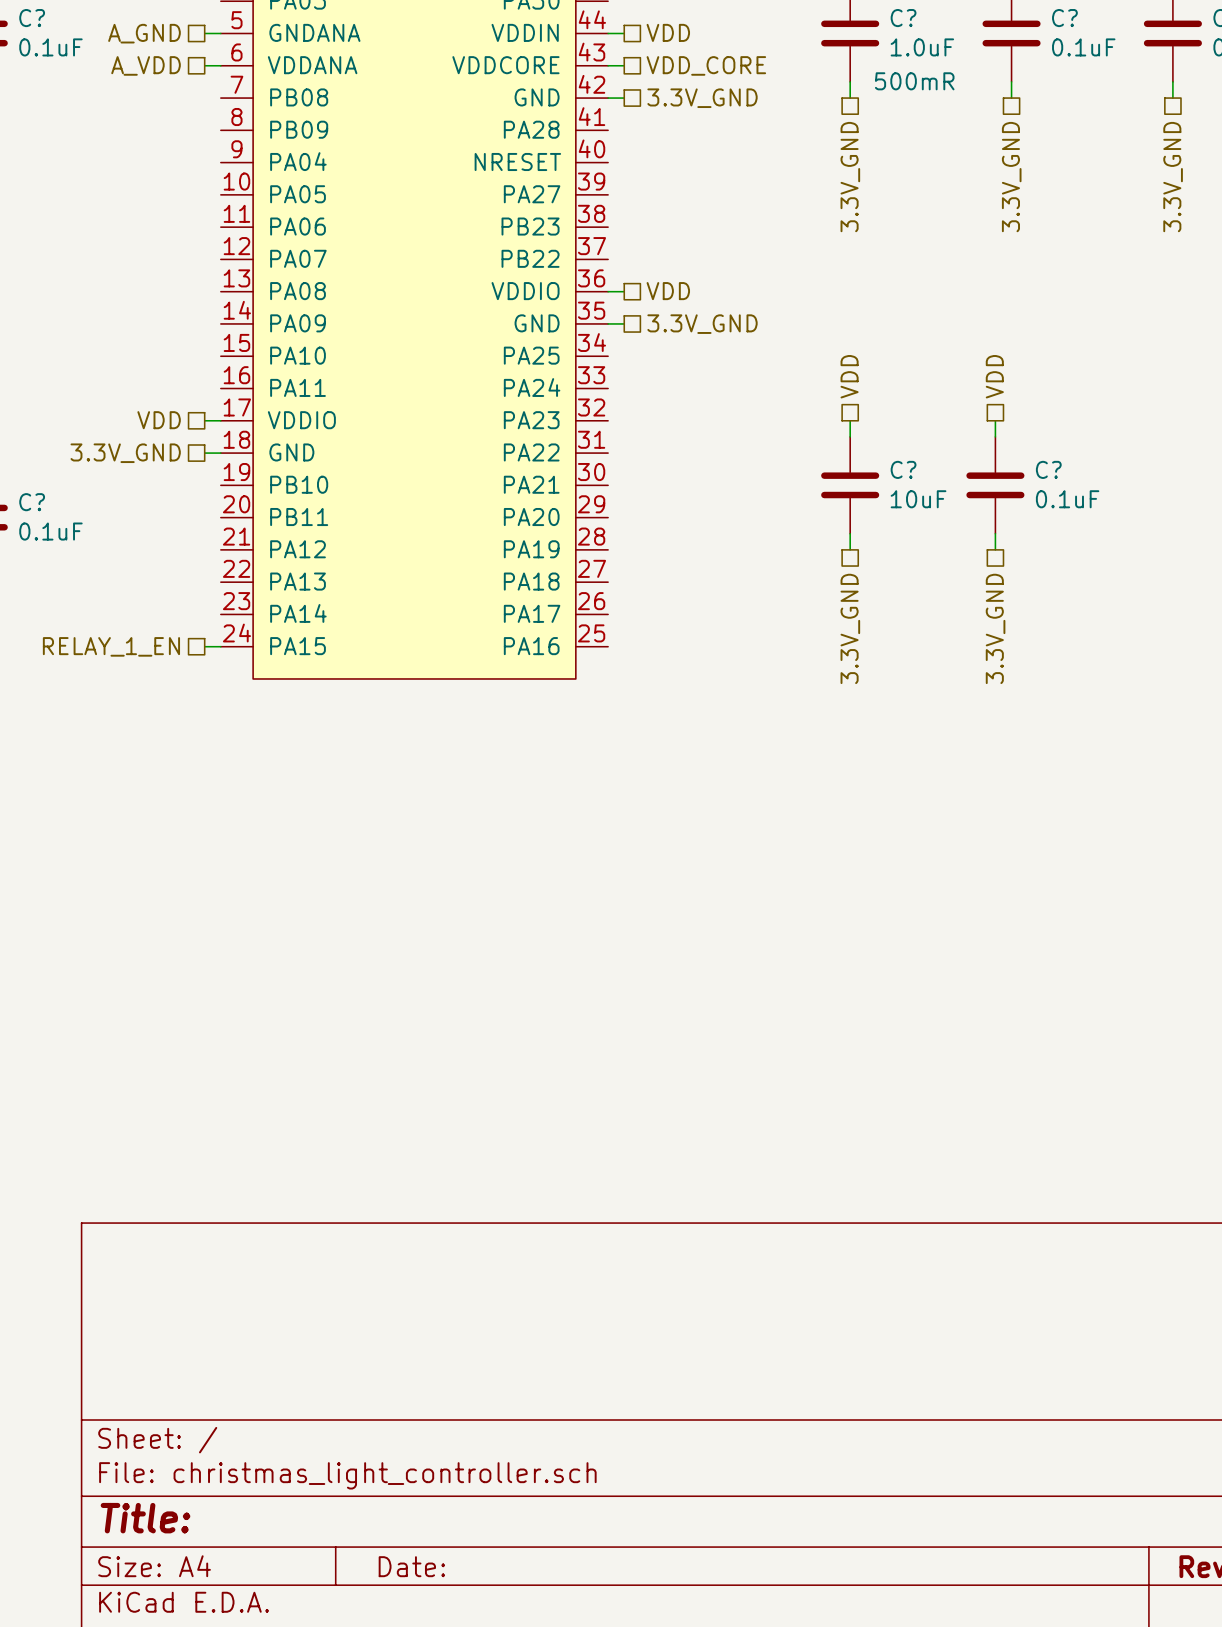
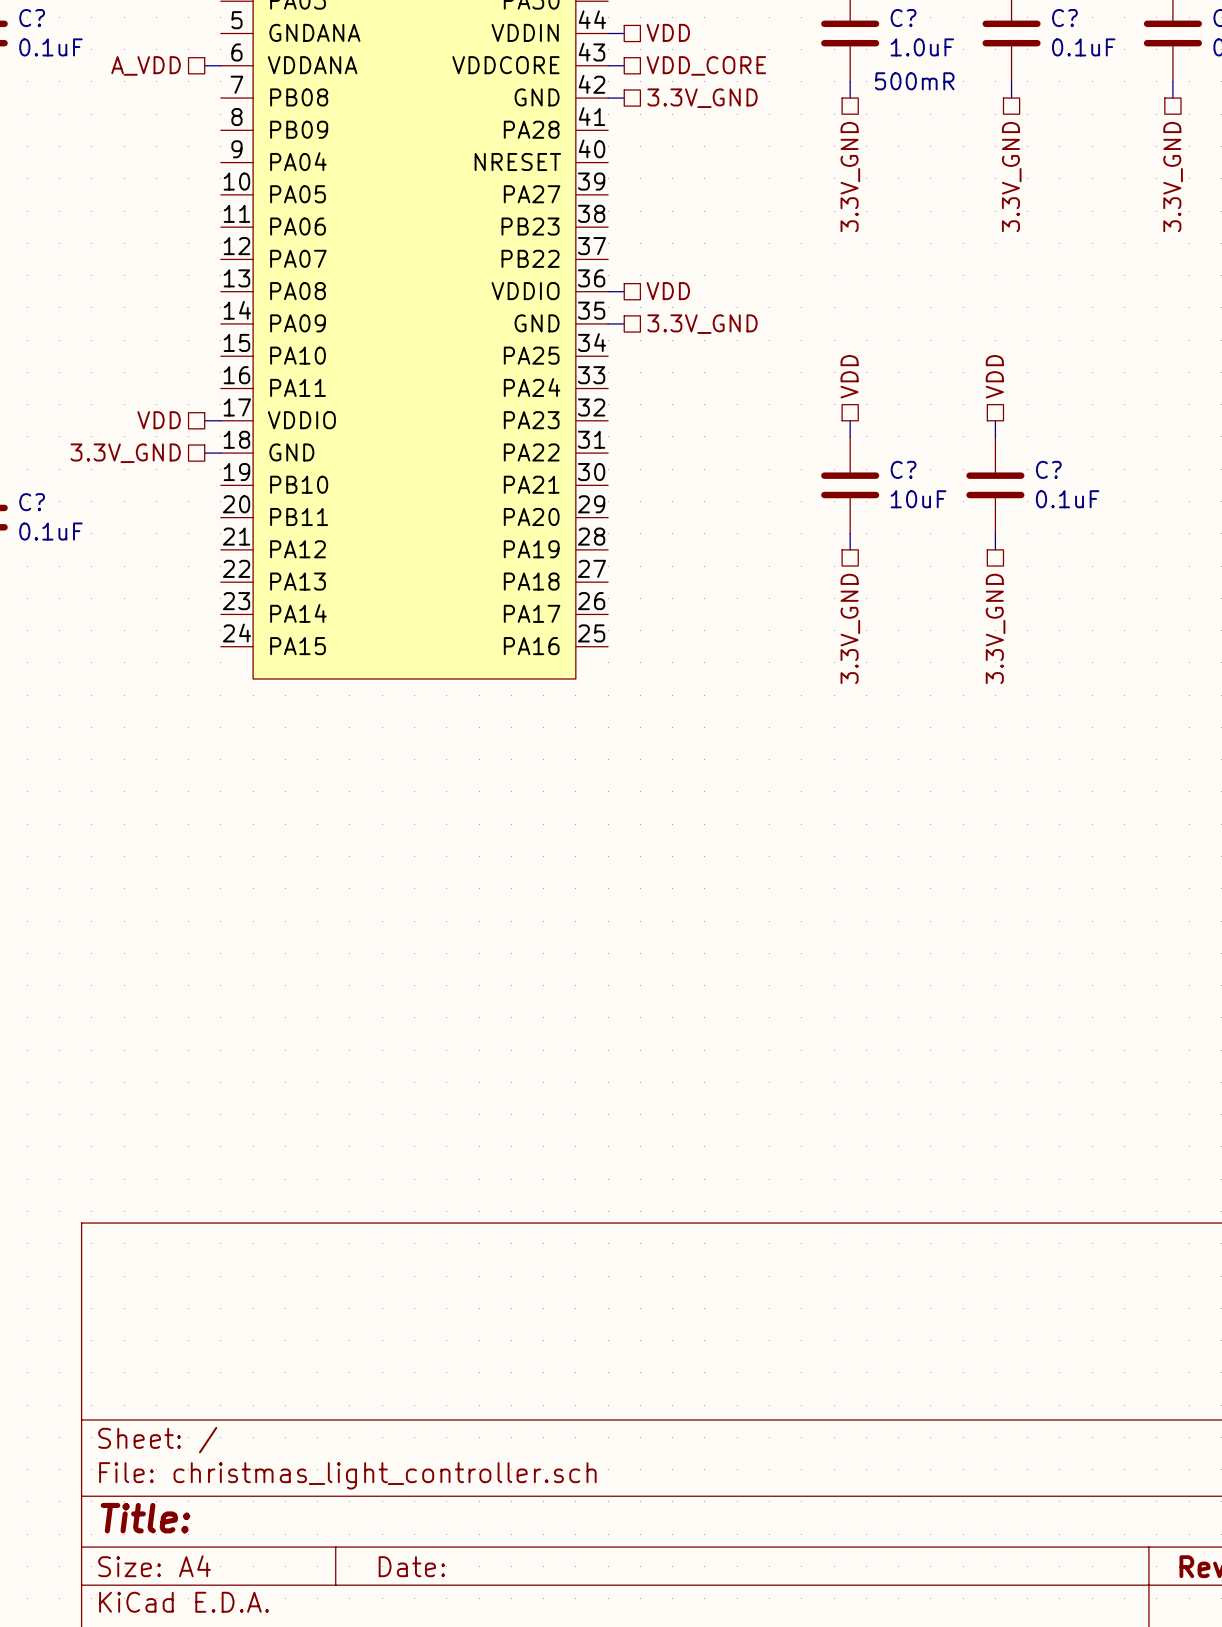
hierarchical label: A_GND (144, 33) -> none
wire: (204, 33) (220, 33) -> none
hierarchical label: RELAY_1_EN (111, 646) -> none
wire: (204, 646) (220, 646) -> none

